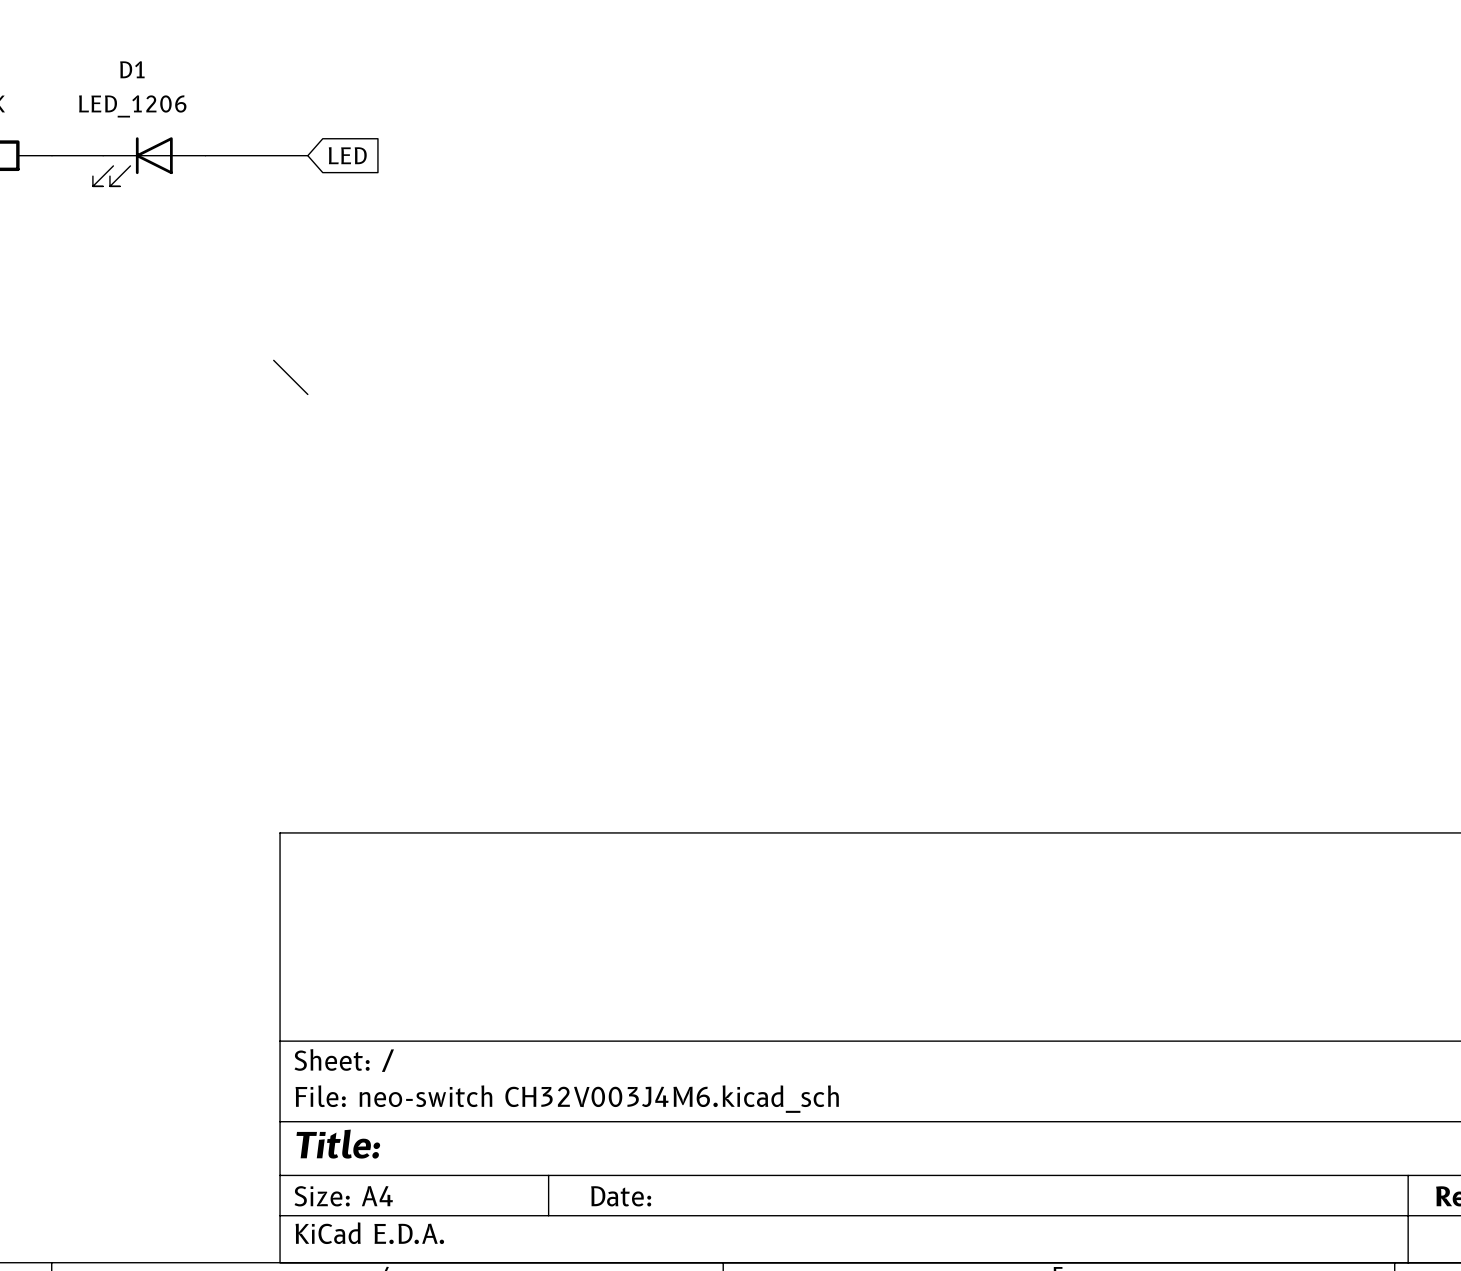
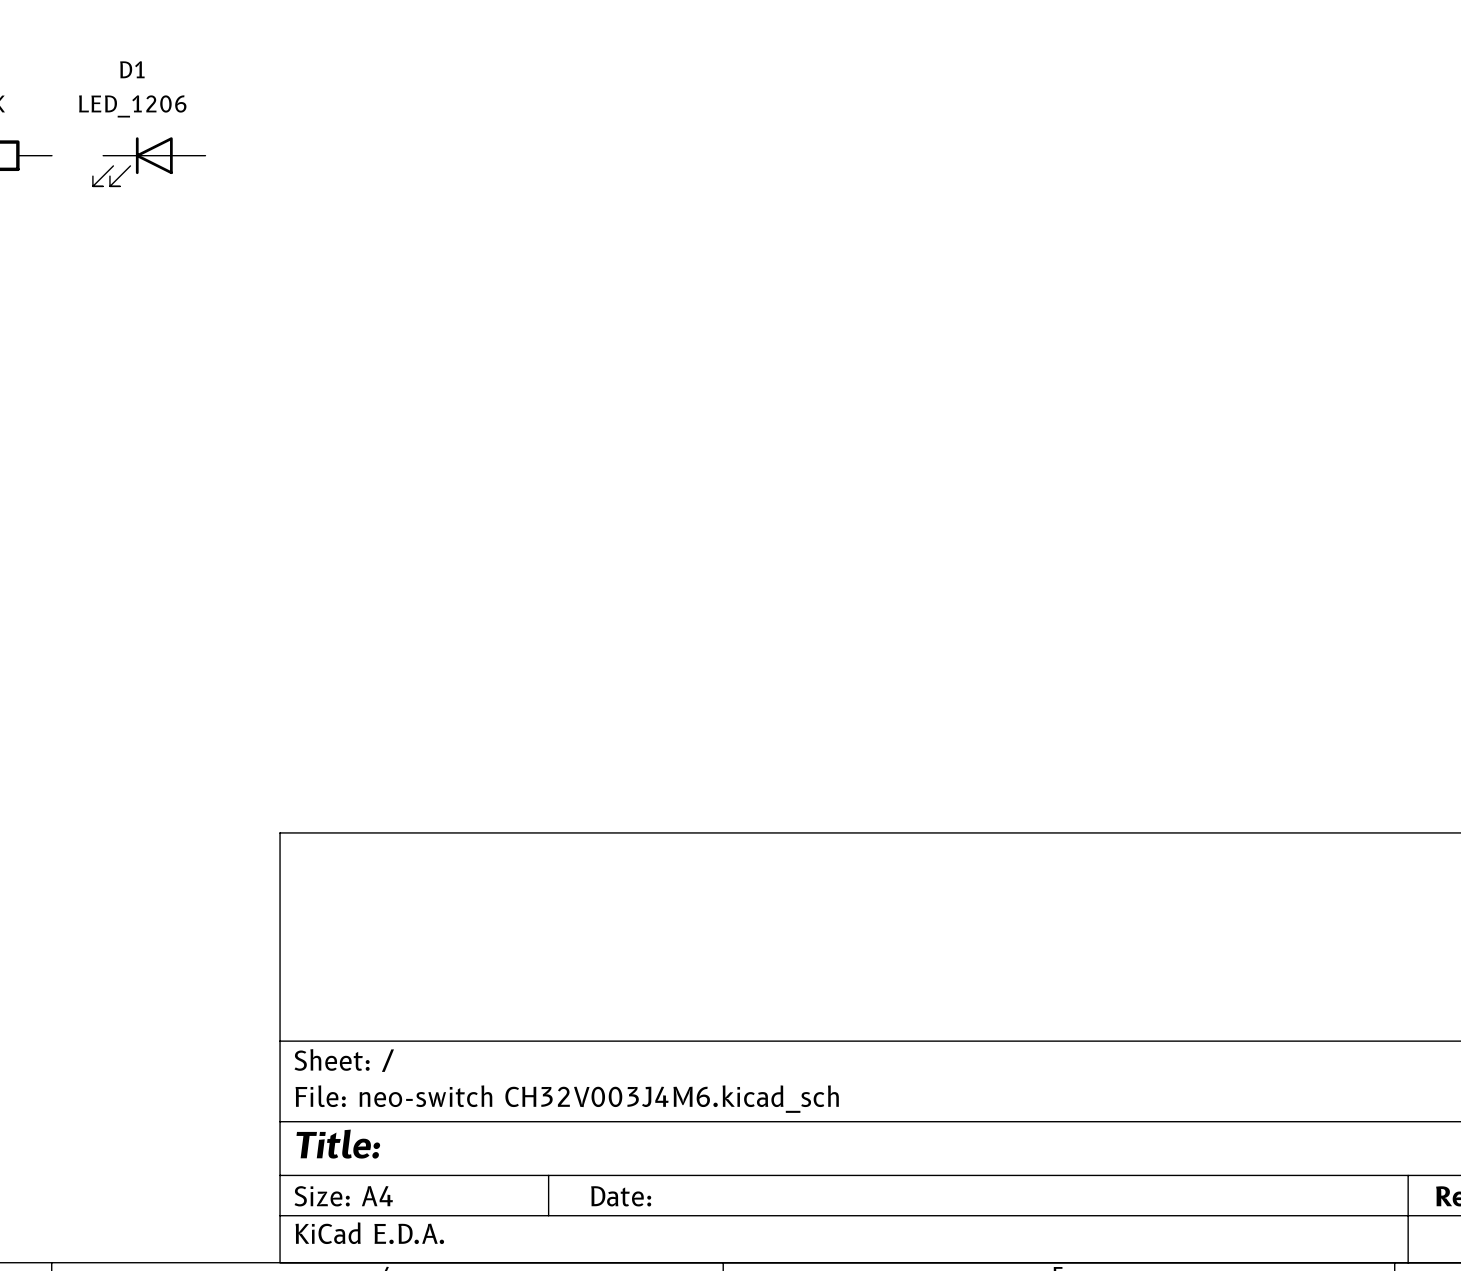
wire: (51, 155) (103, 155) -> none
wire: (205, 155) (307, 155) -> none
global label: LED (347, 155) -> none
wire: (273, 360) (307, 394) -> none

